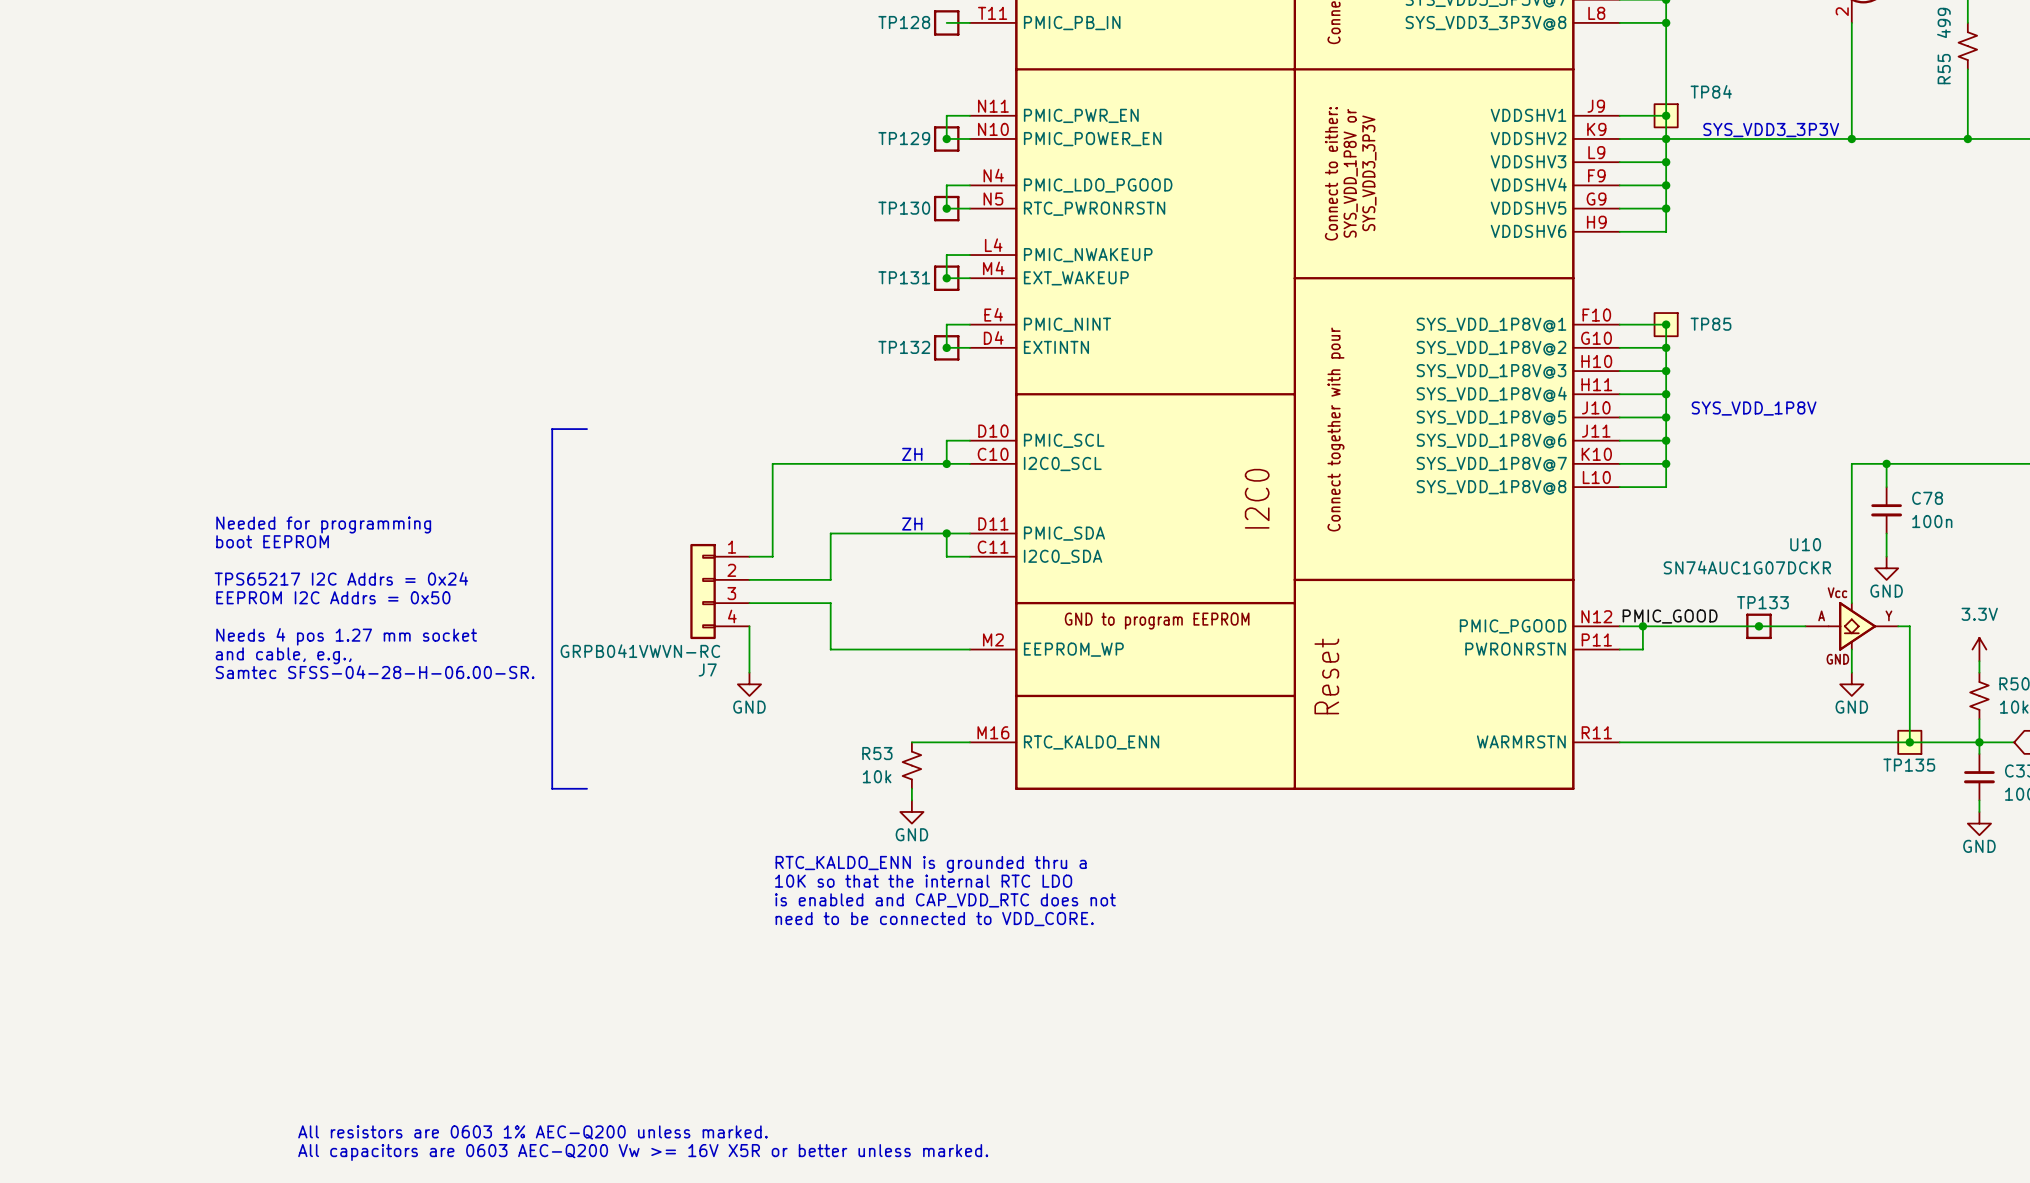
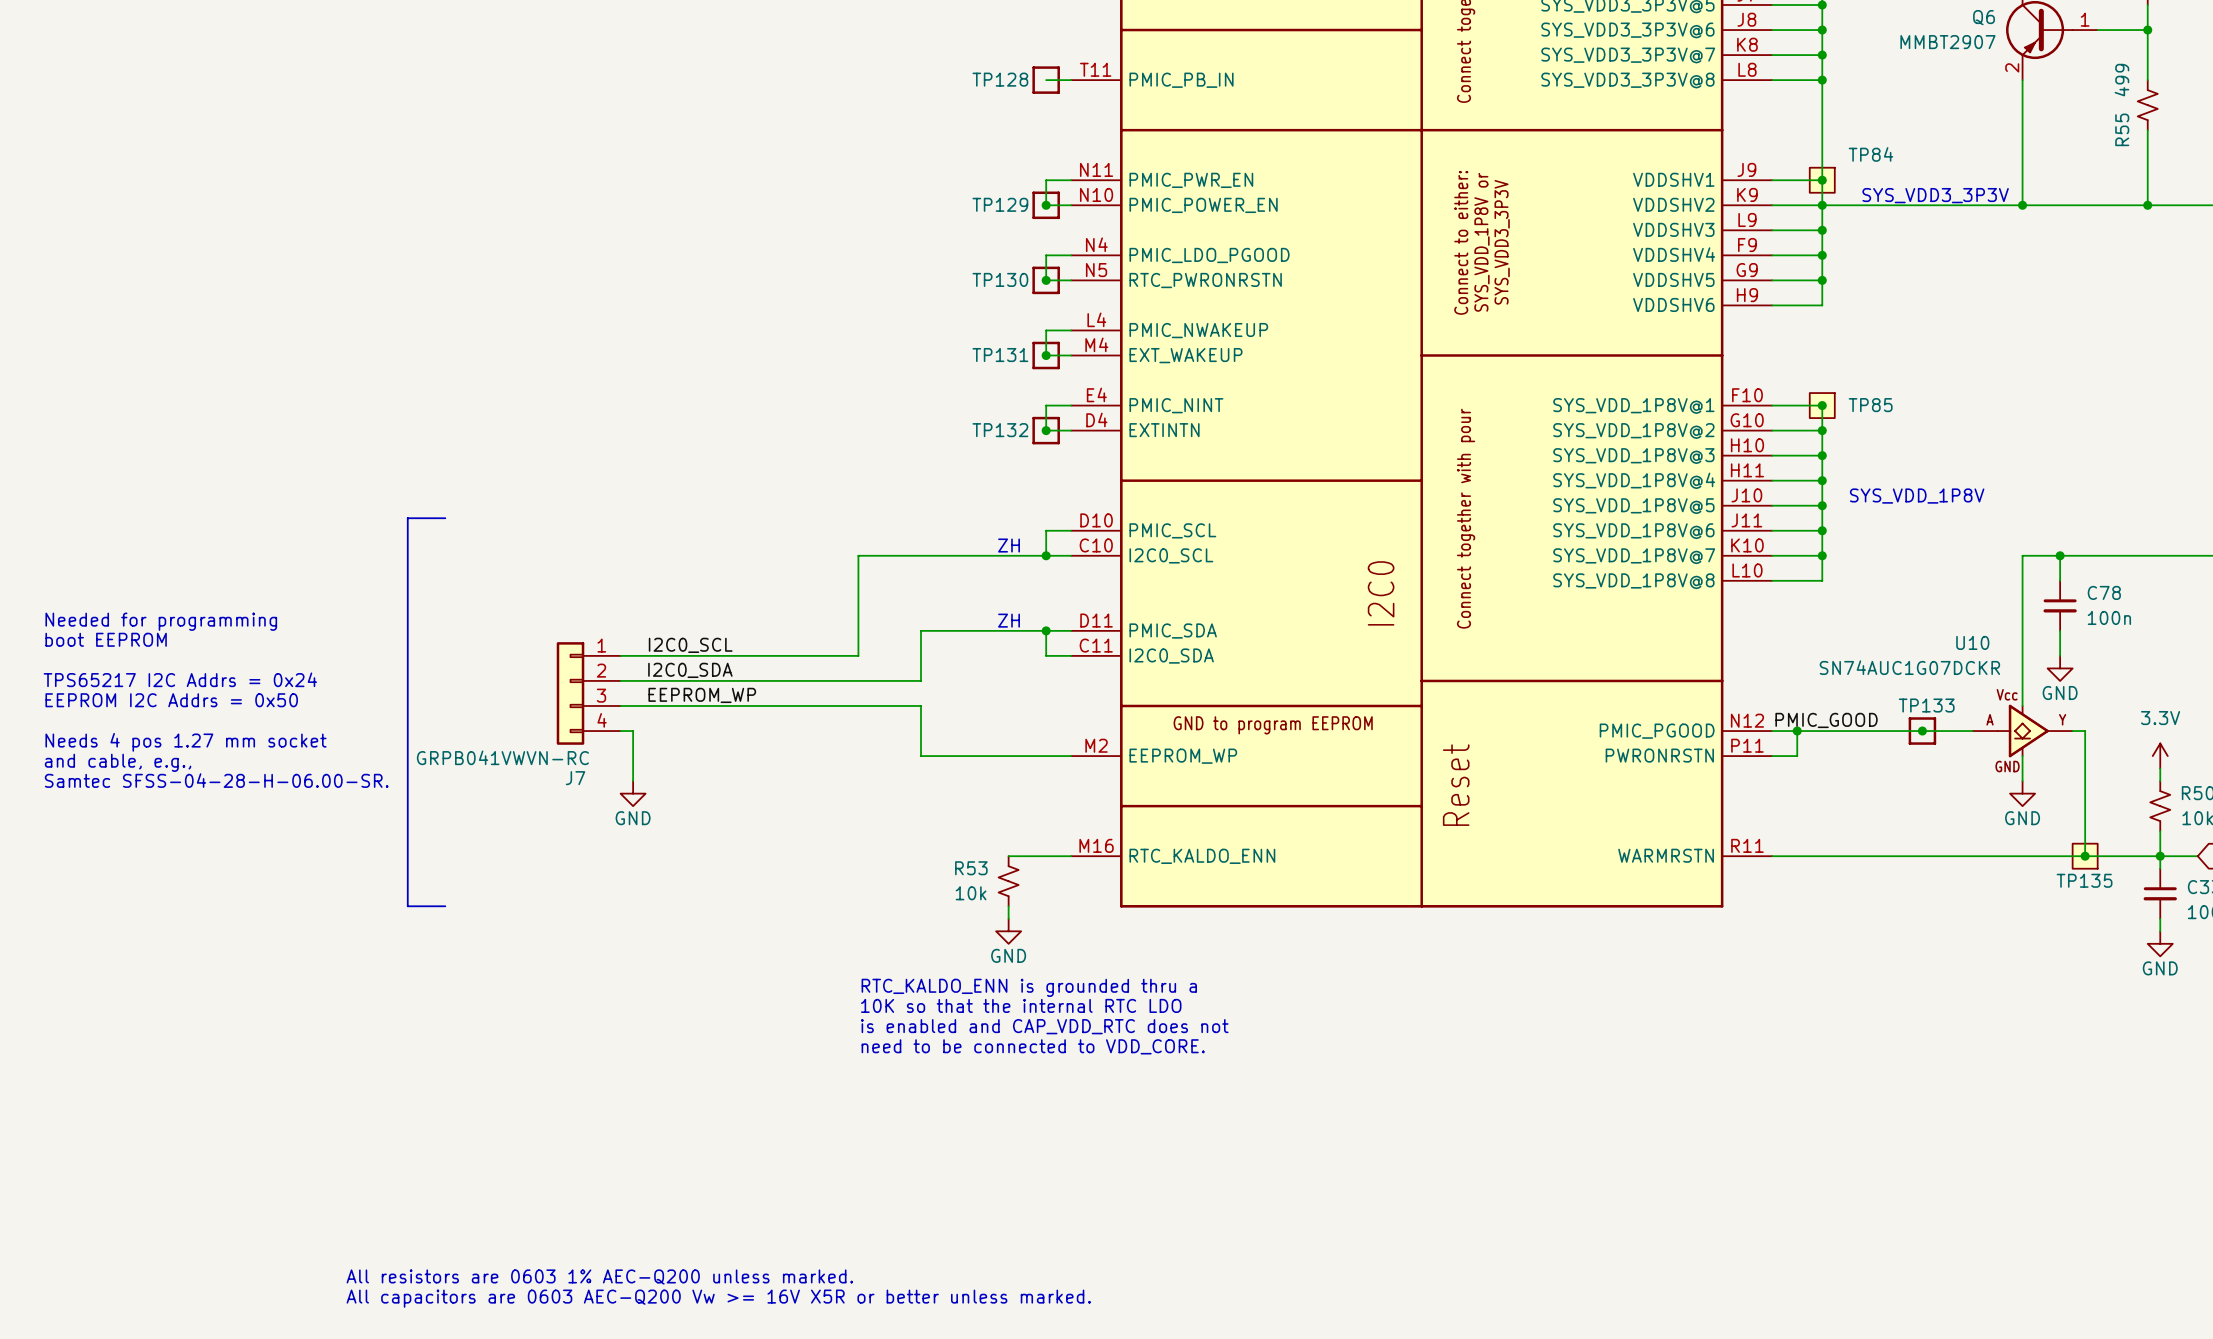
line: (587, 429) (552, 429) (552, 788) (587, 788) -> (445, 518) (407, 518) (407, 906) (445, 906)
text position: Needed for programming (323, 525) -> Needed for programming (161, 621)
text position: boot EEPROM (272, 541) -> boot EEPROM (106, 639)
label: none -> I2C0_SCL (690, 645)
wire: none -> (620, 655) (833, 655)
label: none -> I2C0_SDA (690, 670)
text position: TPS65217 I2C Addrs = 0x24 (341, 578) -> TPS65217 I2C Addrs = 0x24 (180, 679)
wire: none -> (620, 680) (833, 680)
J7 position: (719, 591) -> (588, 693)
label: none -> EEPROM_WP (702, 695)
text position: EEPROM I2C Addrs = 0x50 (333, 597) -> EEPROM I2C Addrs = 0x50 (171, 700)
wire: none -> (620, 705) (833, 705)
wire: none -> (620, 731) (633, 731) (633, 781)
wire: (749, 626) (749, 672) -> none
text position: Needs 4 pos 1.27 mm socket (346, 636) -> Needs 4 pos 1.27 mm socket (186, 742)
text position: and cable, e.g., (283, 655) -> and cable, e.g., (118, 762)
text position: Samtec SFSS-04-28-H-06.00-SR. (375, 672) -> Samtec SFSS-04-28-H-06.00-SR. (216, 780)
power symbol position: GND (749, 684) -> GND (633, 793)

